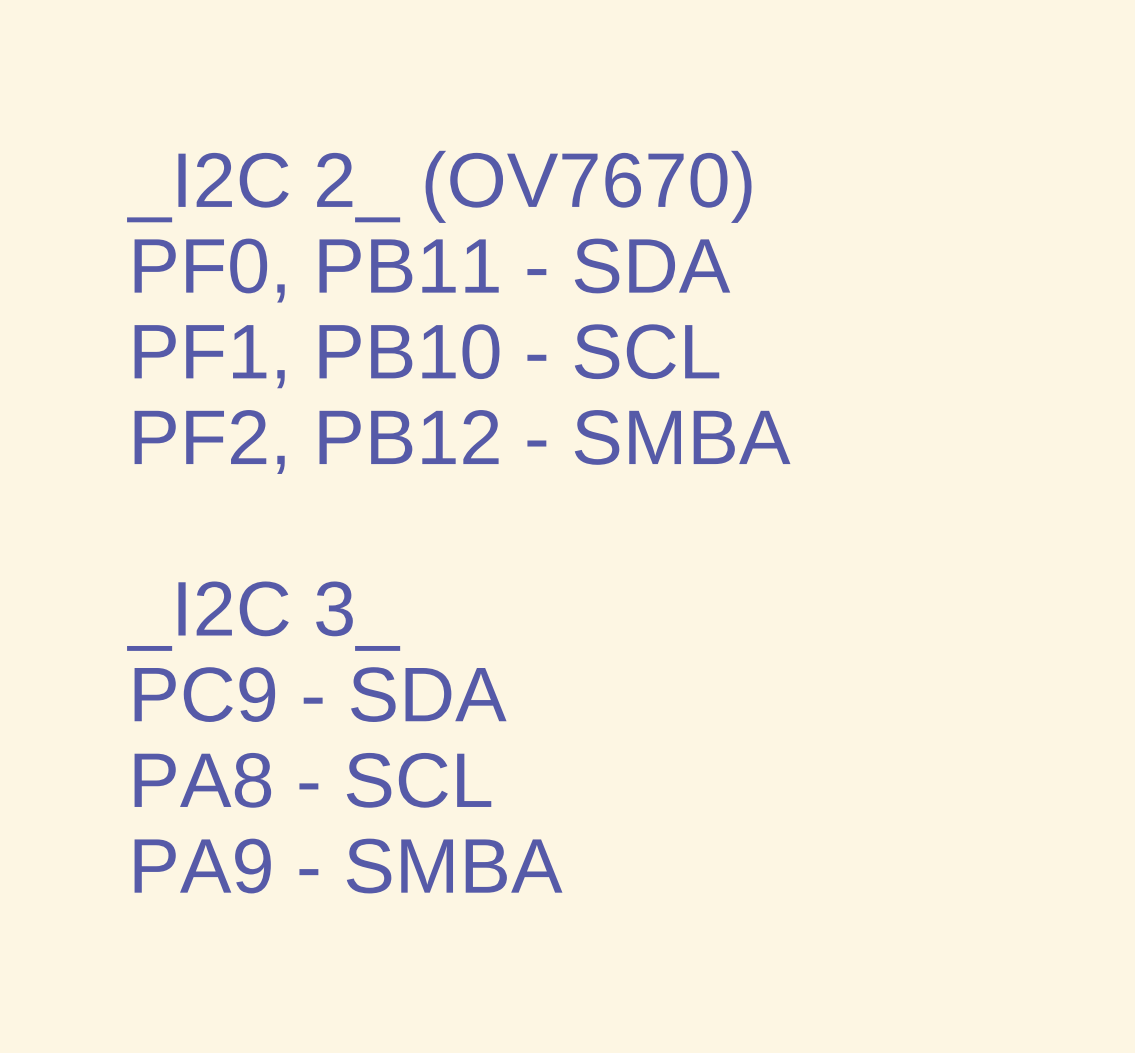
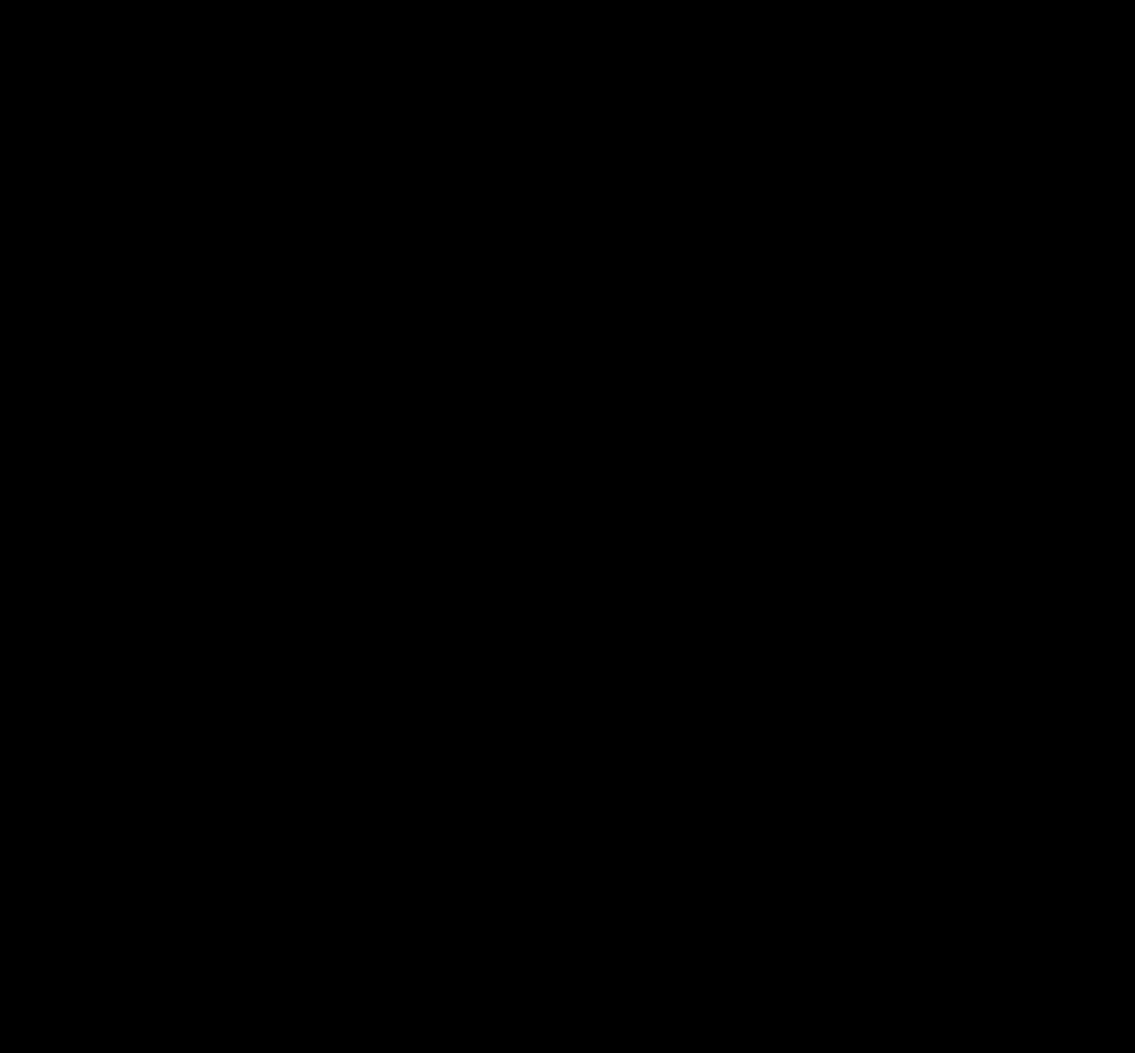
text: _I2C 2_ (OV7670) (439, 186) -> none
text: PF0, PB11 - SDA (432, 270) -> none
text: PF1, PB10 - SCL (426, 356) -> none
text: PF2, PB12 - SMBA (462, 442) -> none
text: _I2C 3_ (263, 616) -> none
text: PC9 - SDA (320, 694) -> none
text: PA8 - SCL (312, 780) -> none
text: PA9 - SMBA (348, 866) -> none

